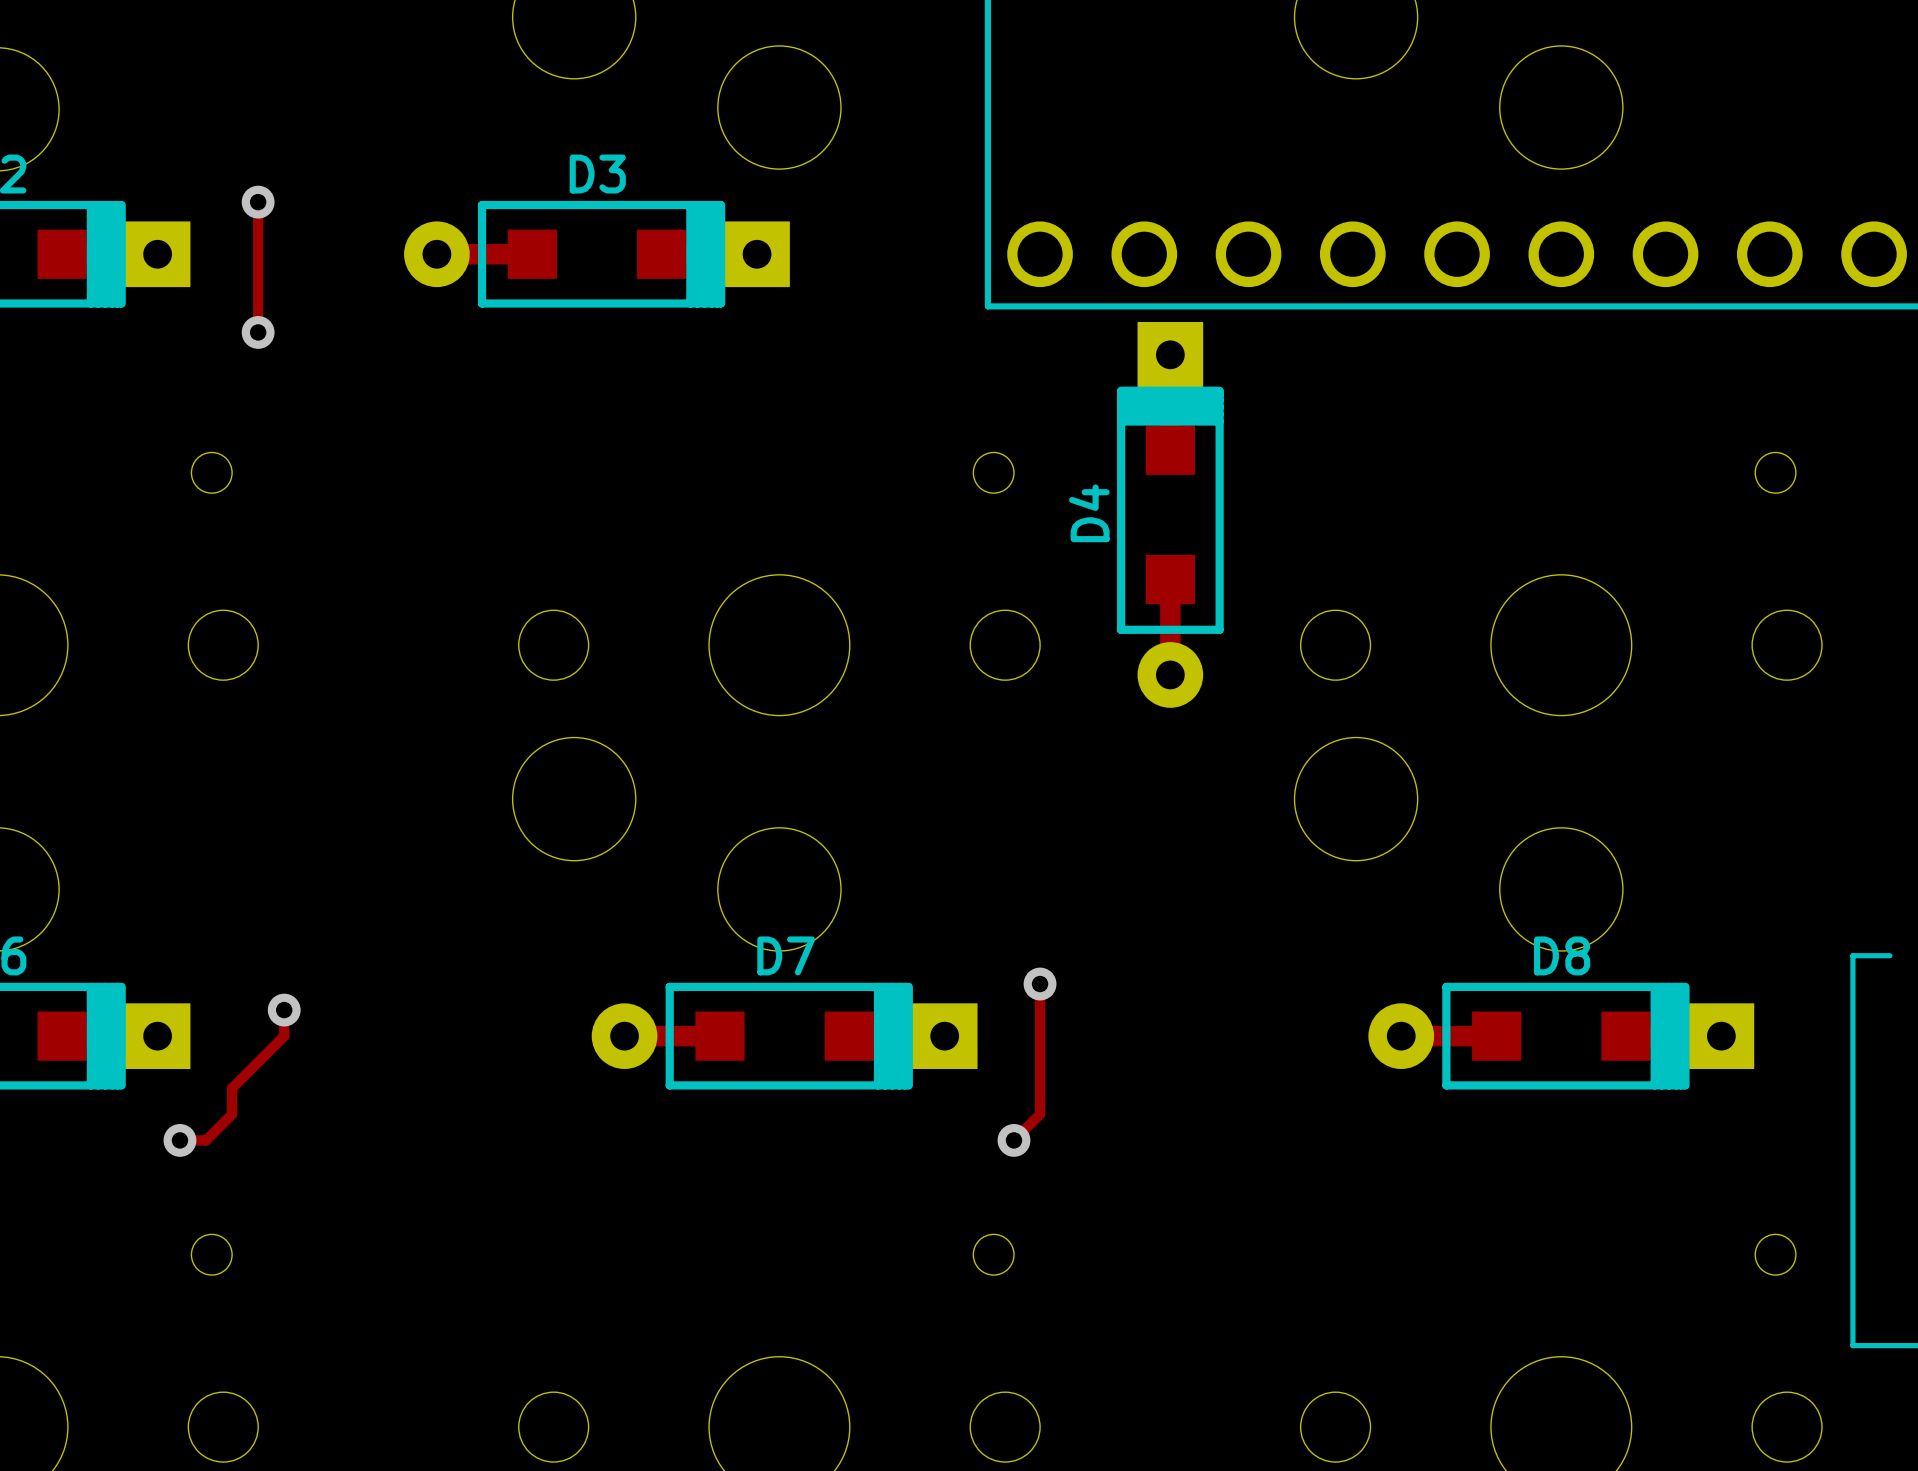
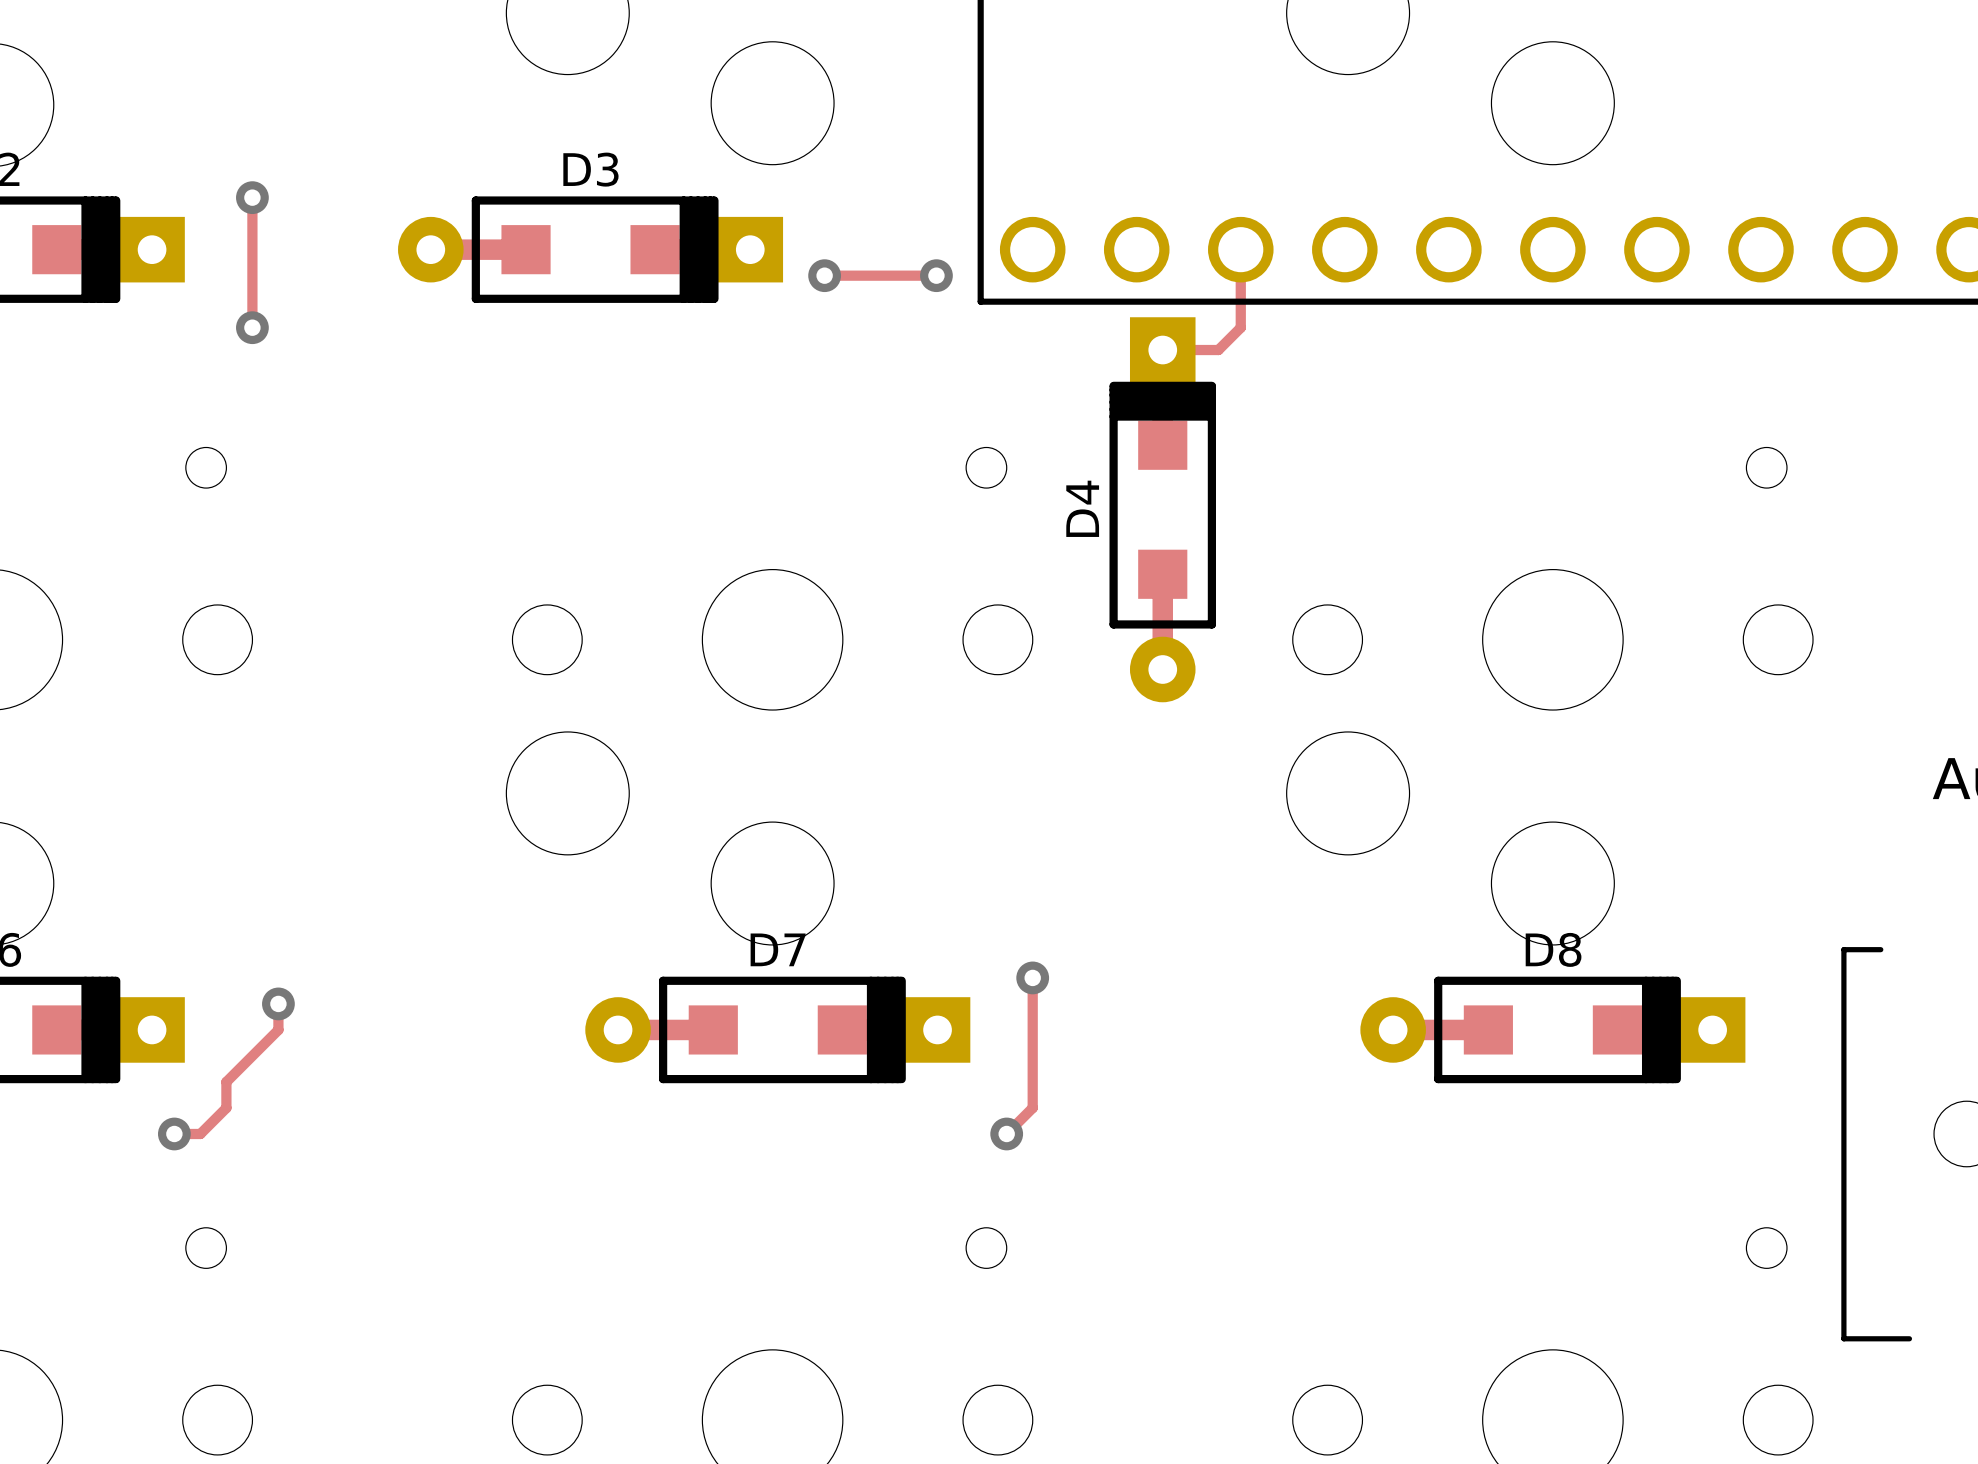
track: none -> (1240, 249) (1240, 327) (1218, 350) (1162, 350)
track: none -> (824, 275) (936, 275)
via: none -> (824, 275)
via: none -> (936, 275)

